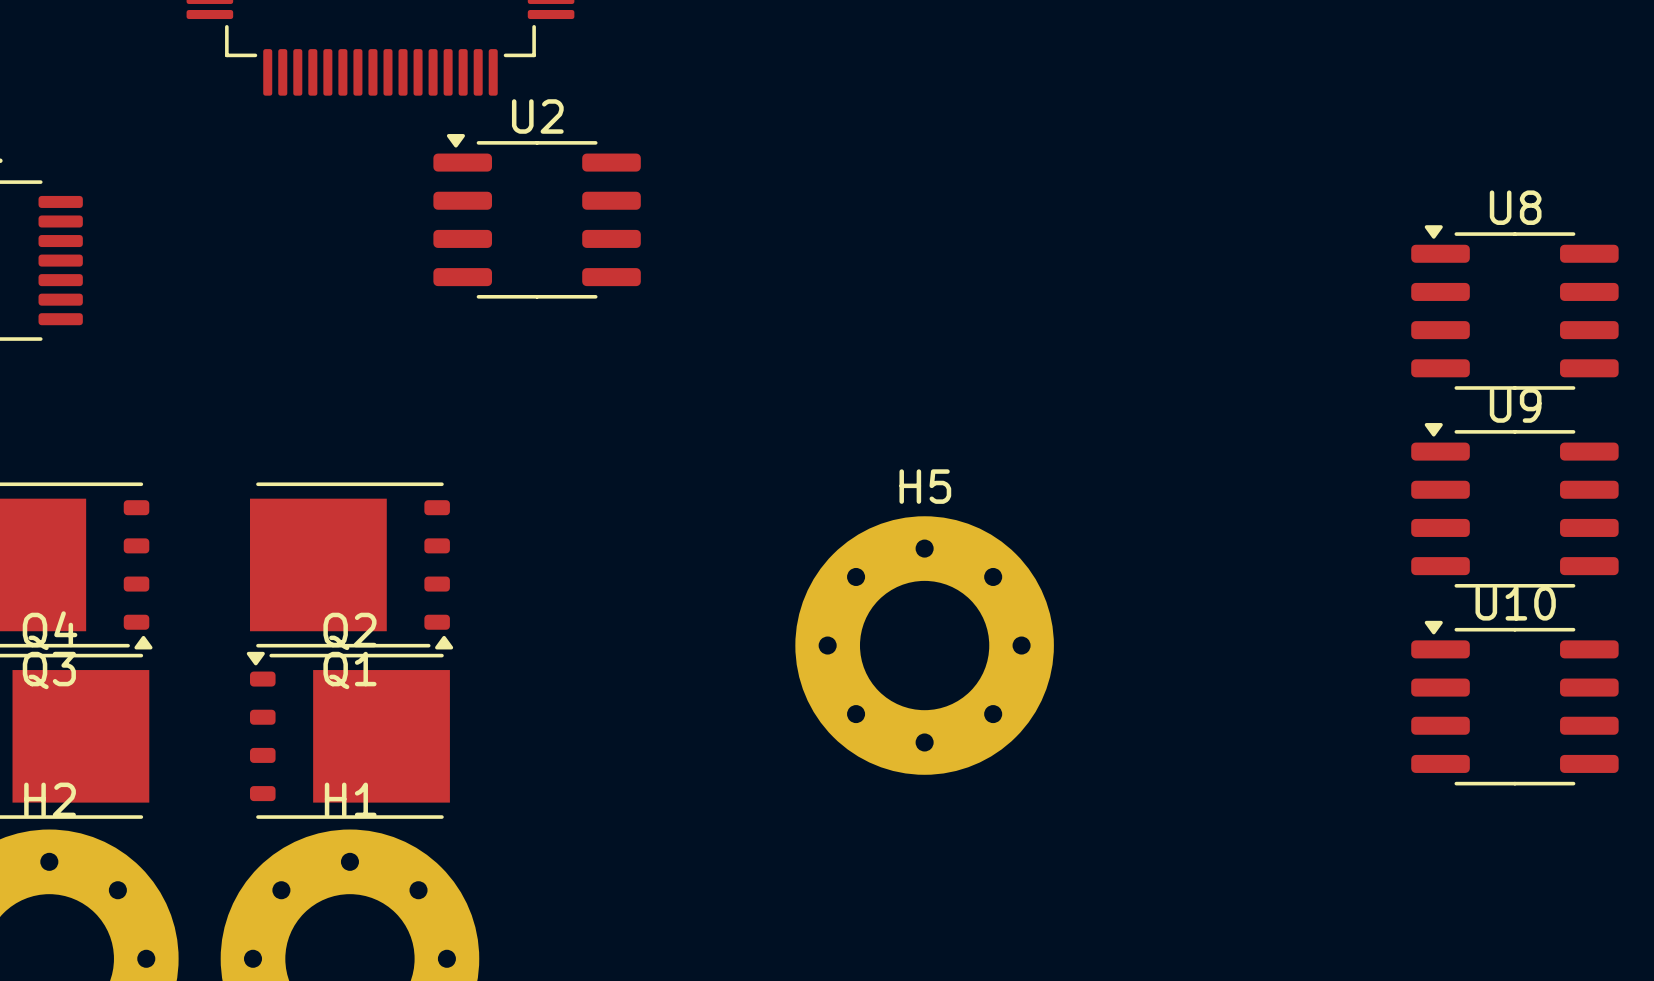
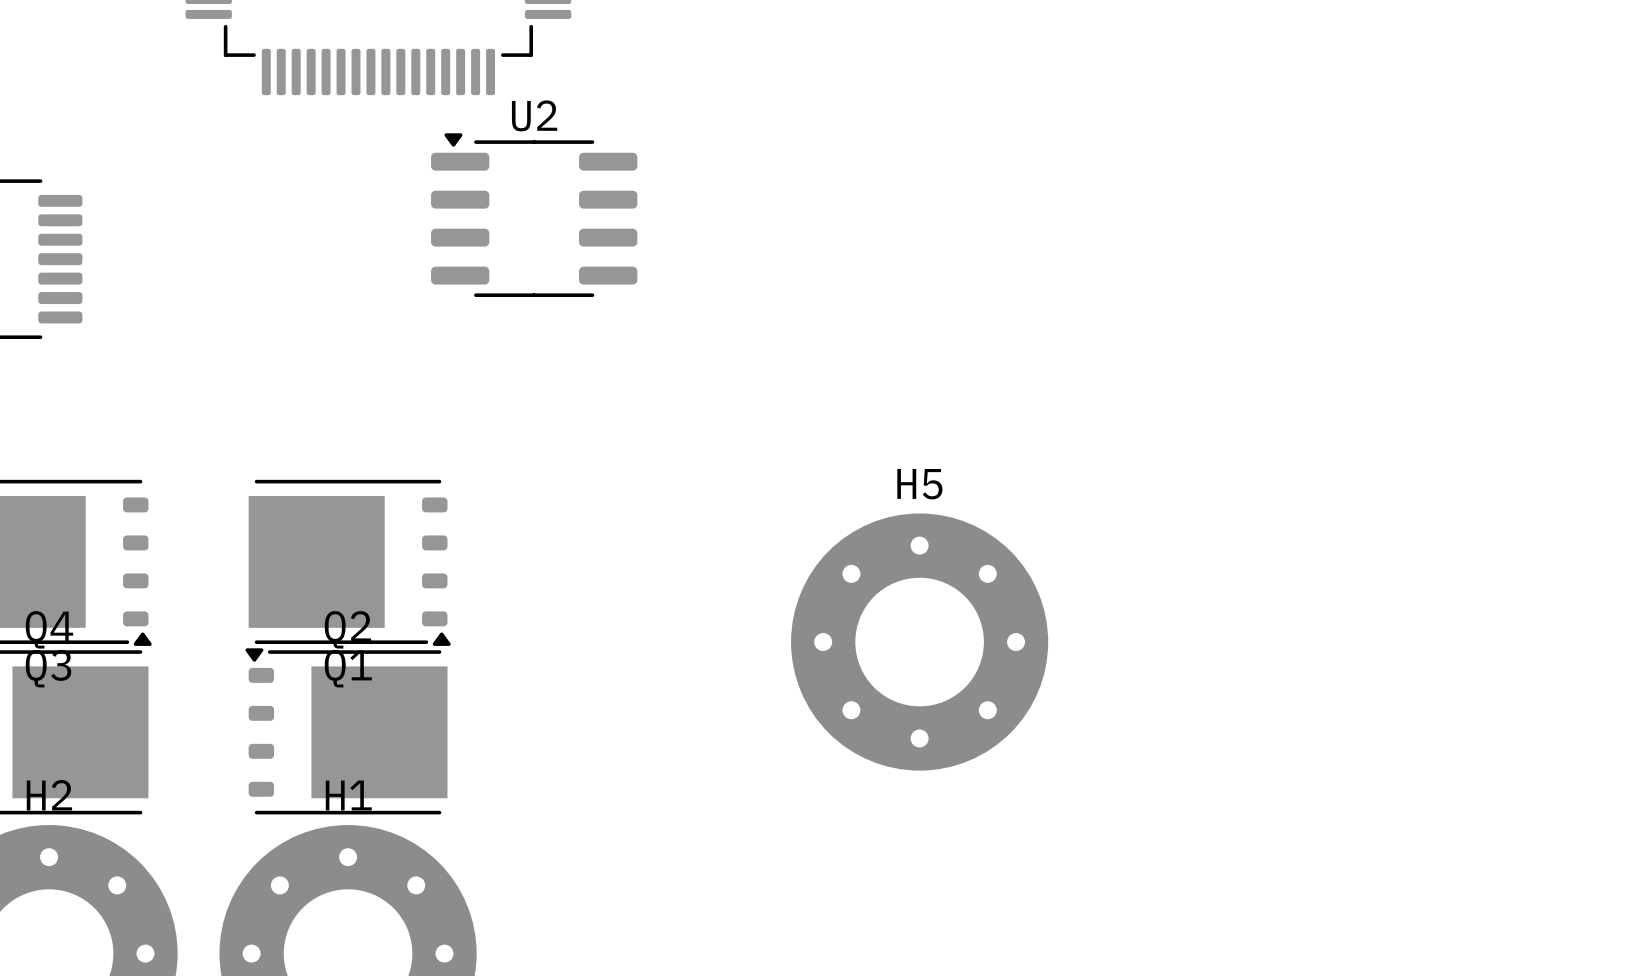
U8: (1514, 307) -> none
U9: (1514, 505) -> none
U10: (1514, 703) -> none

